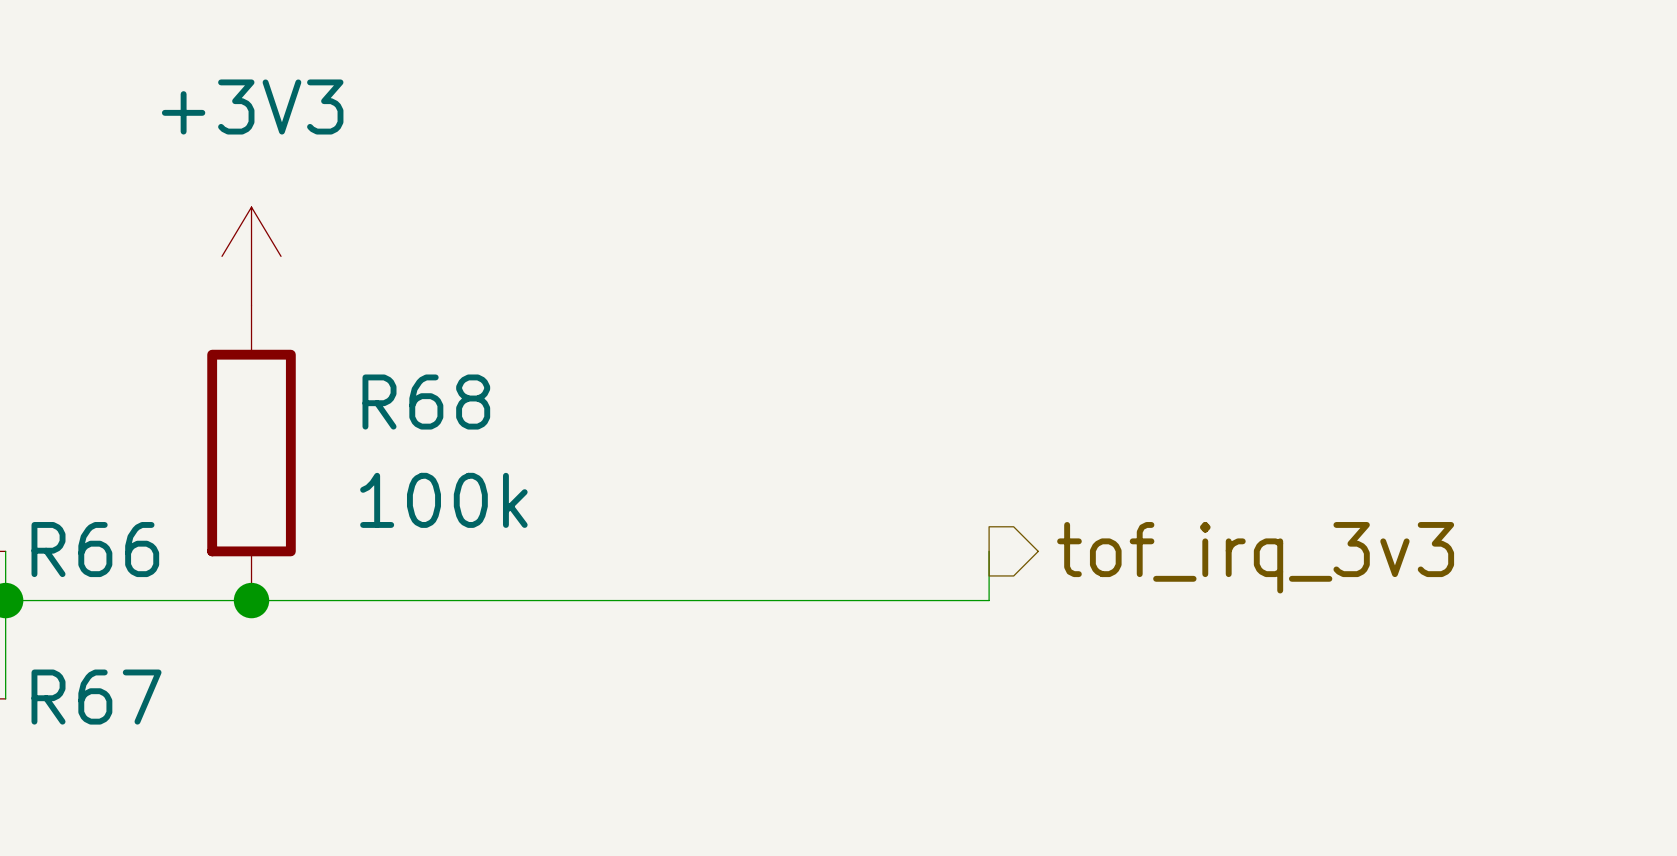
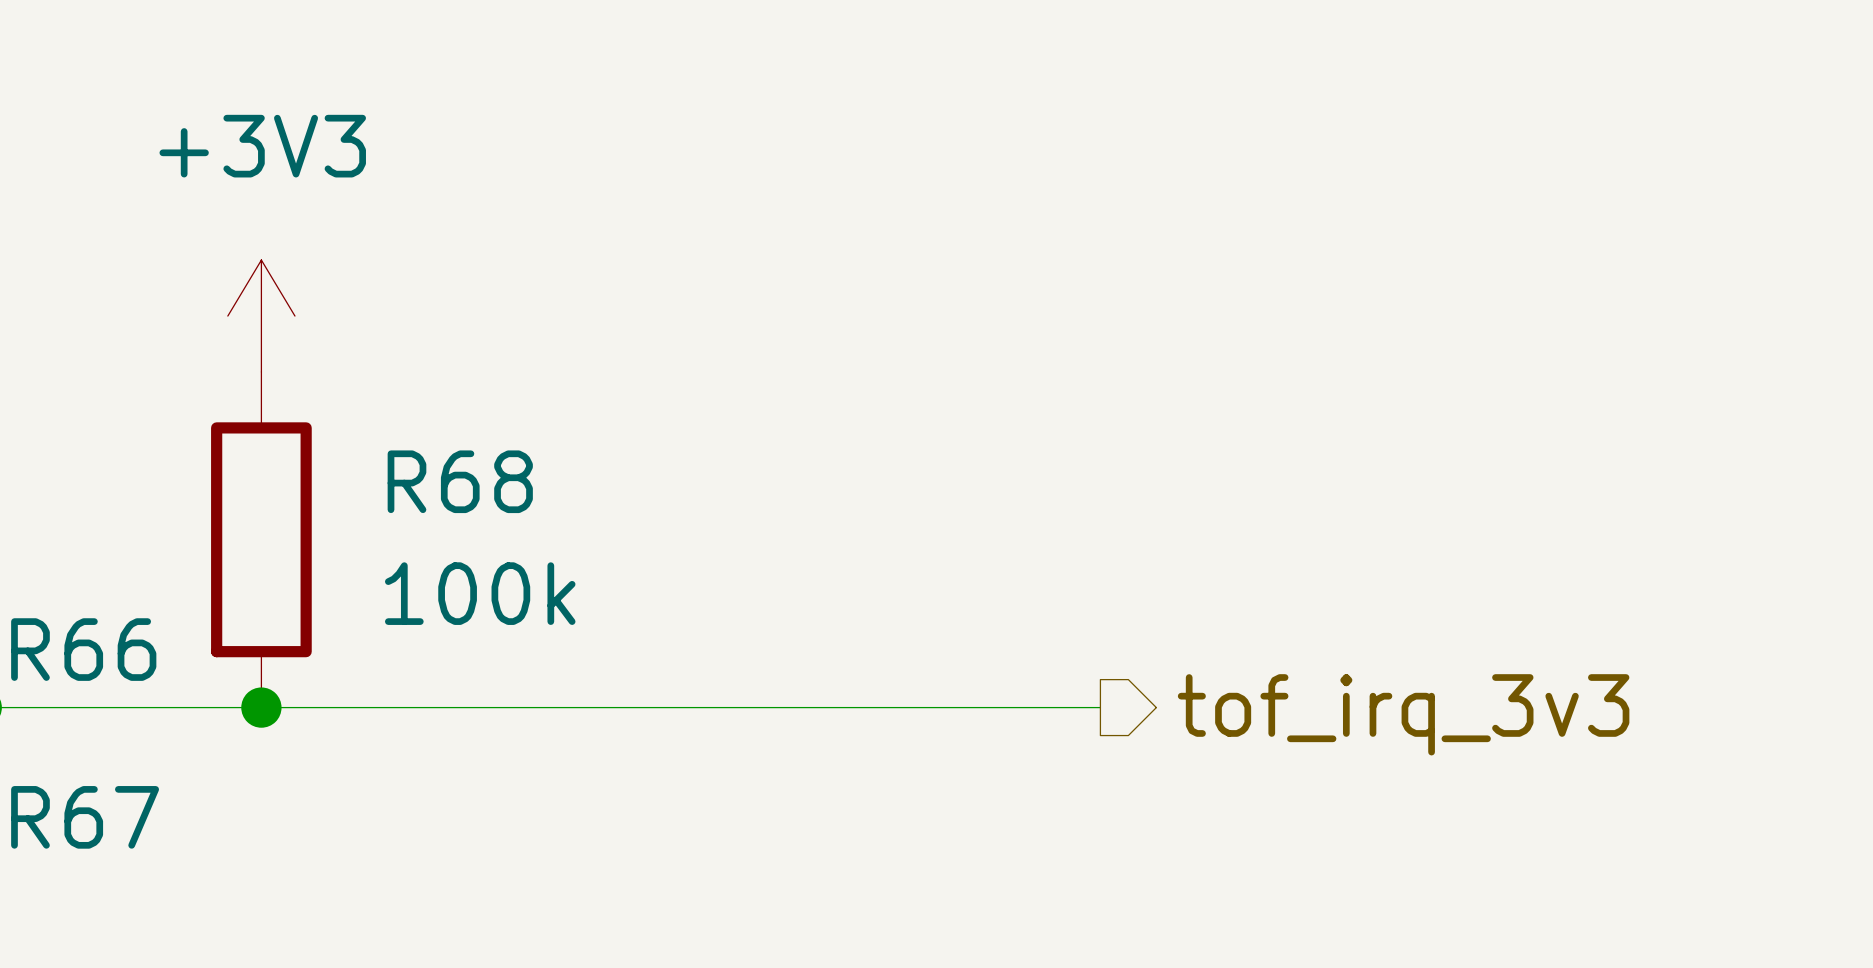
wire: (989, 551) (989, 600) -> none
hierarchical label position: tof_irq_3v3 (1255, 557) -> tof_irq_3v3 (1403, 714)

